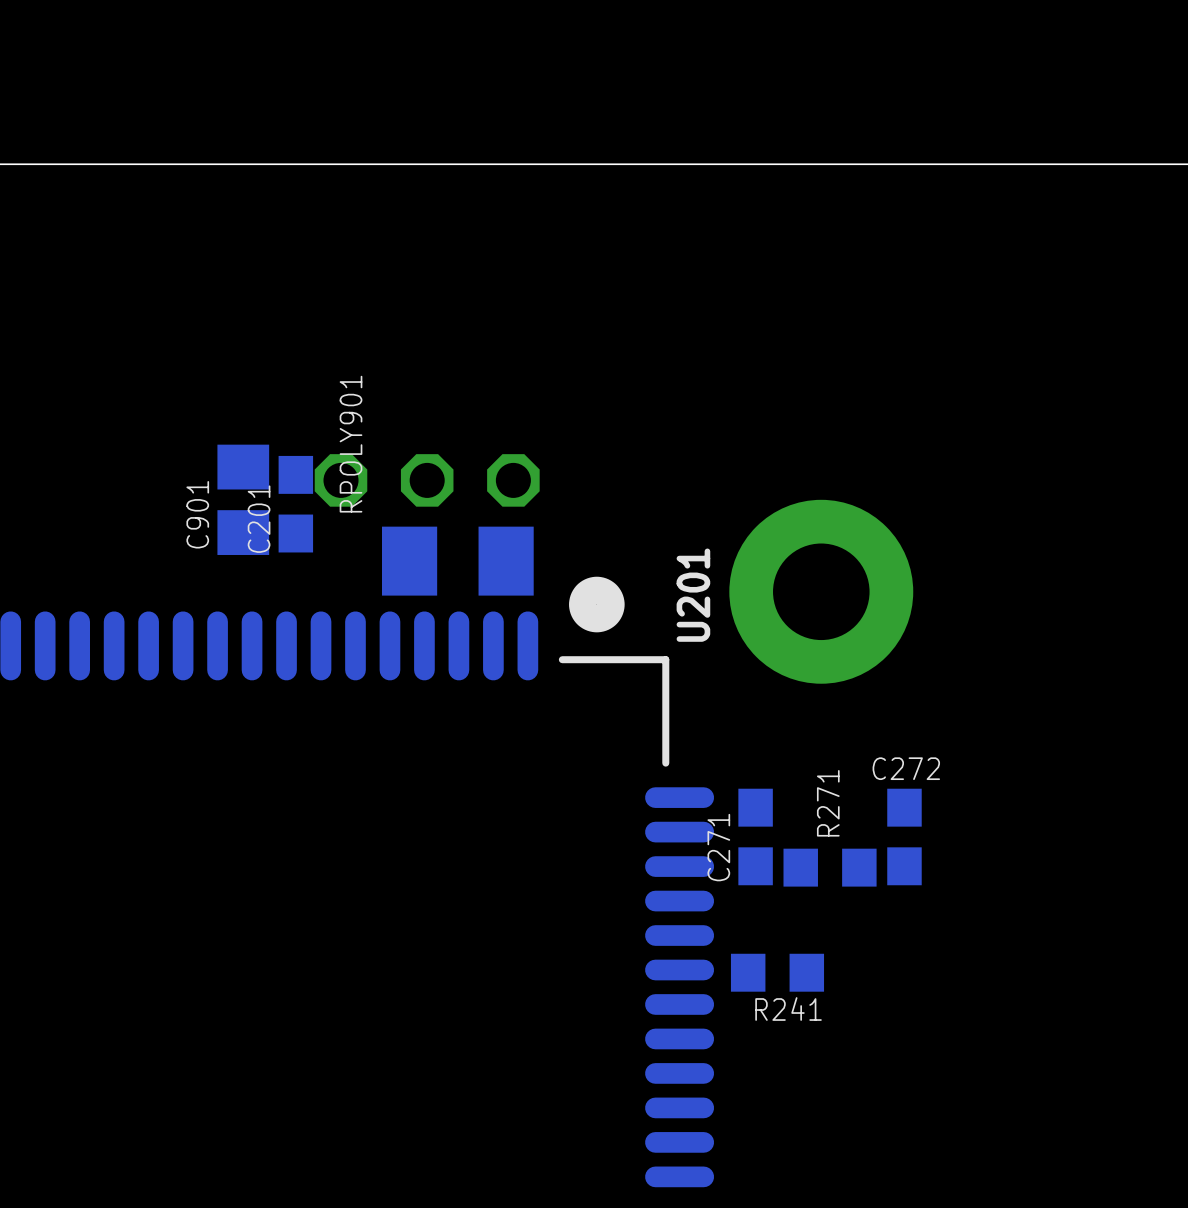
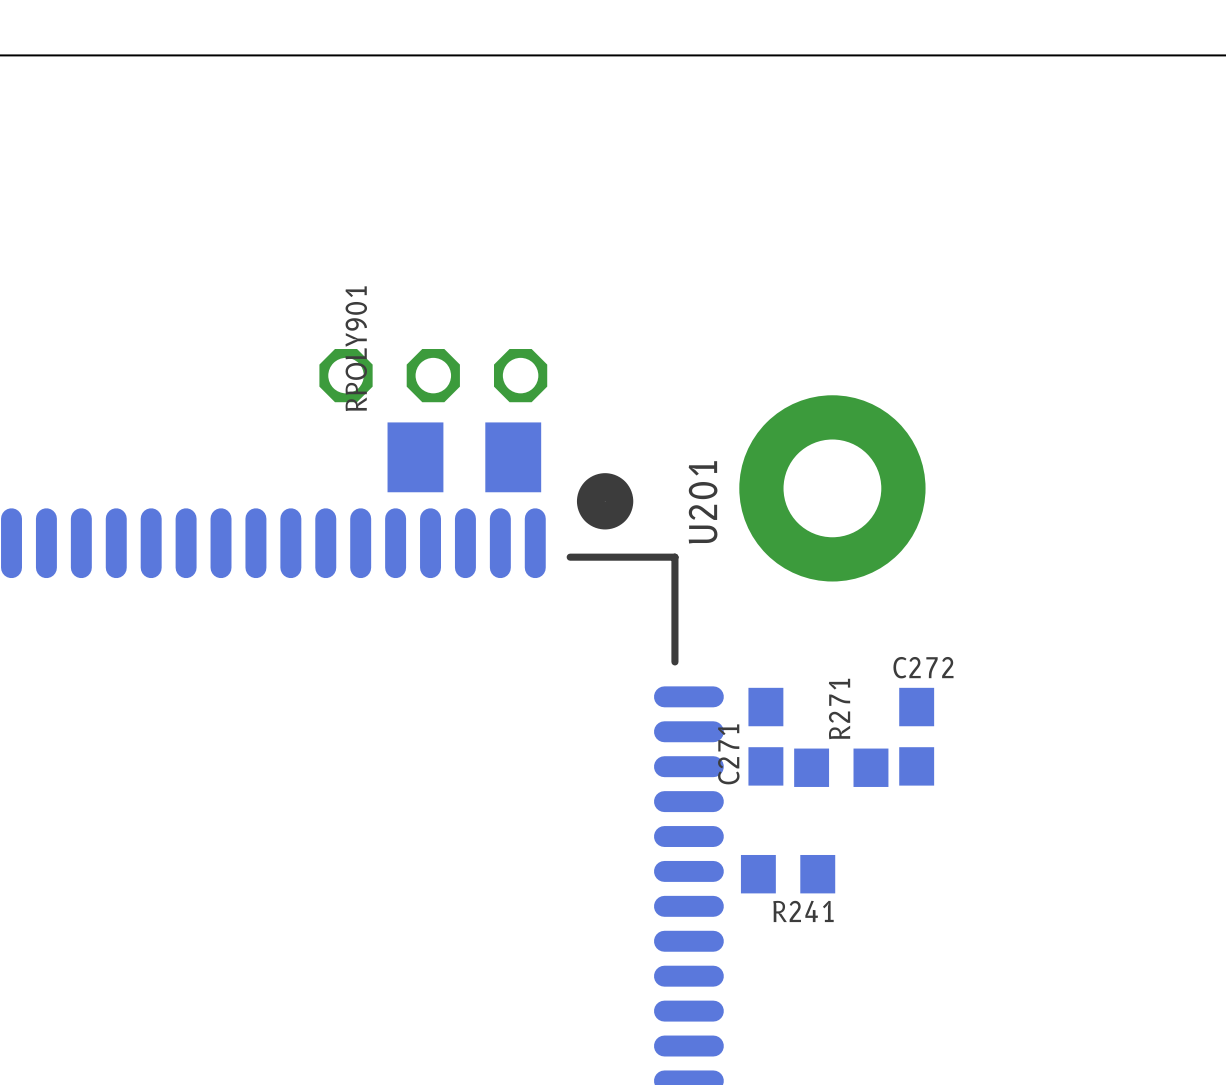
C901: (243, 499) -> none
C201: (295, 504) -> none

